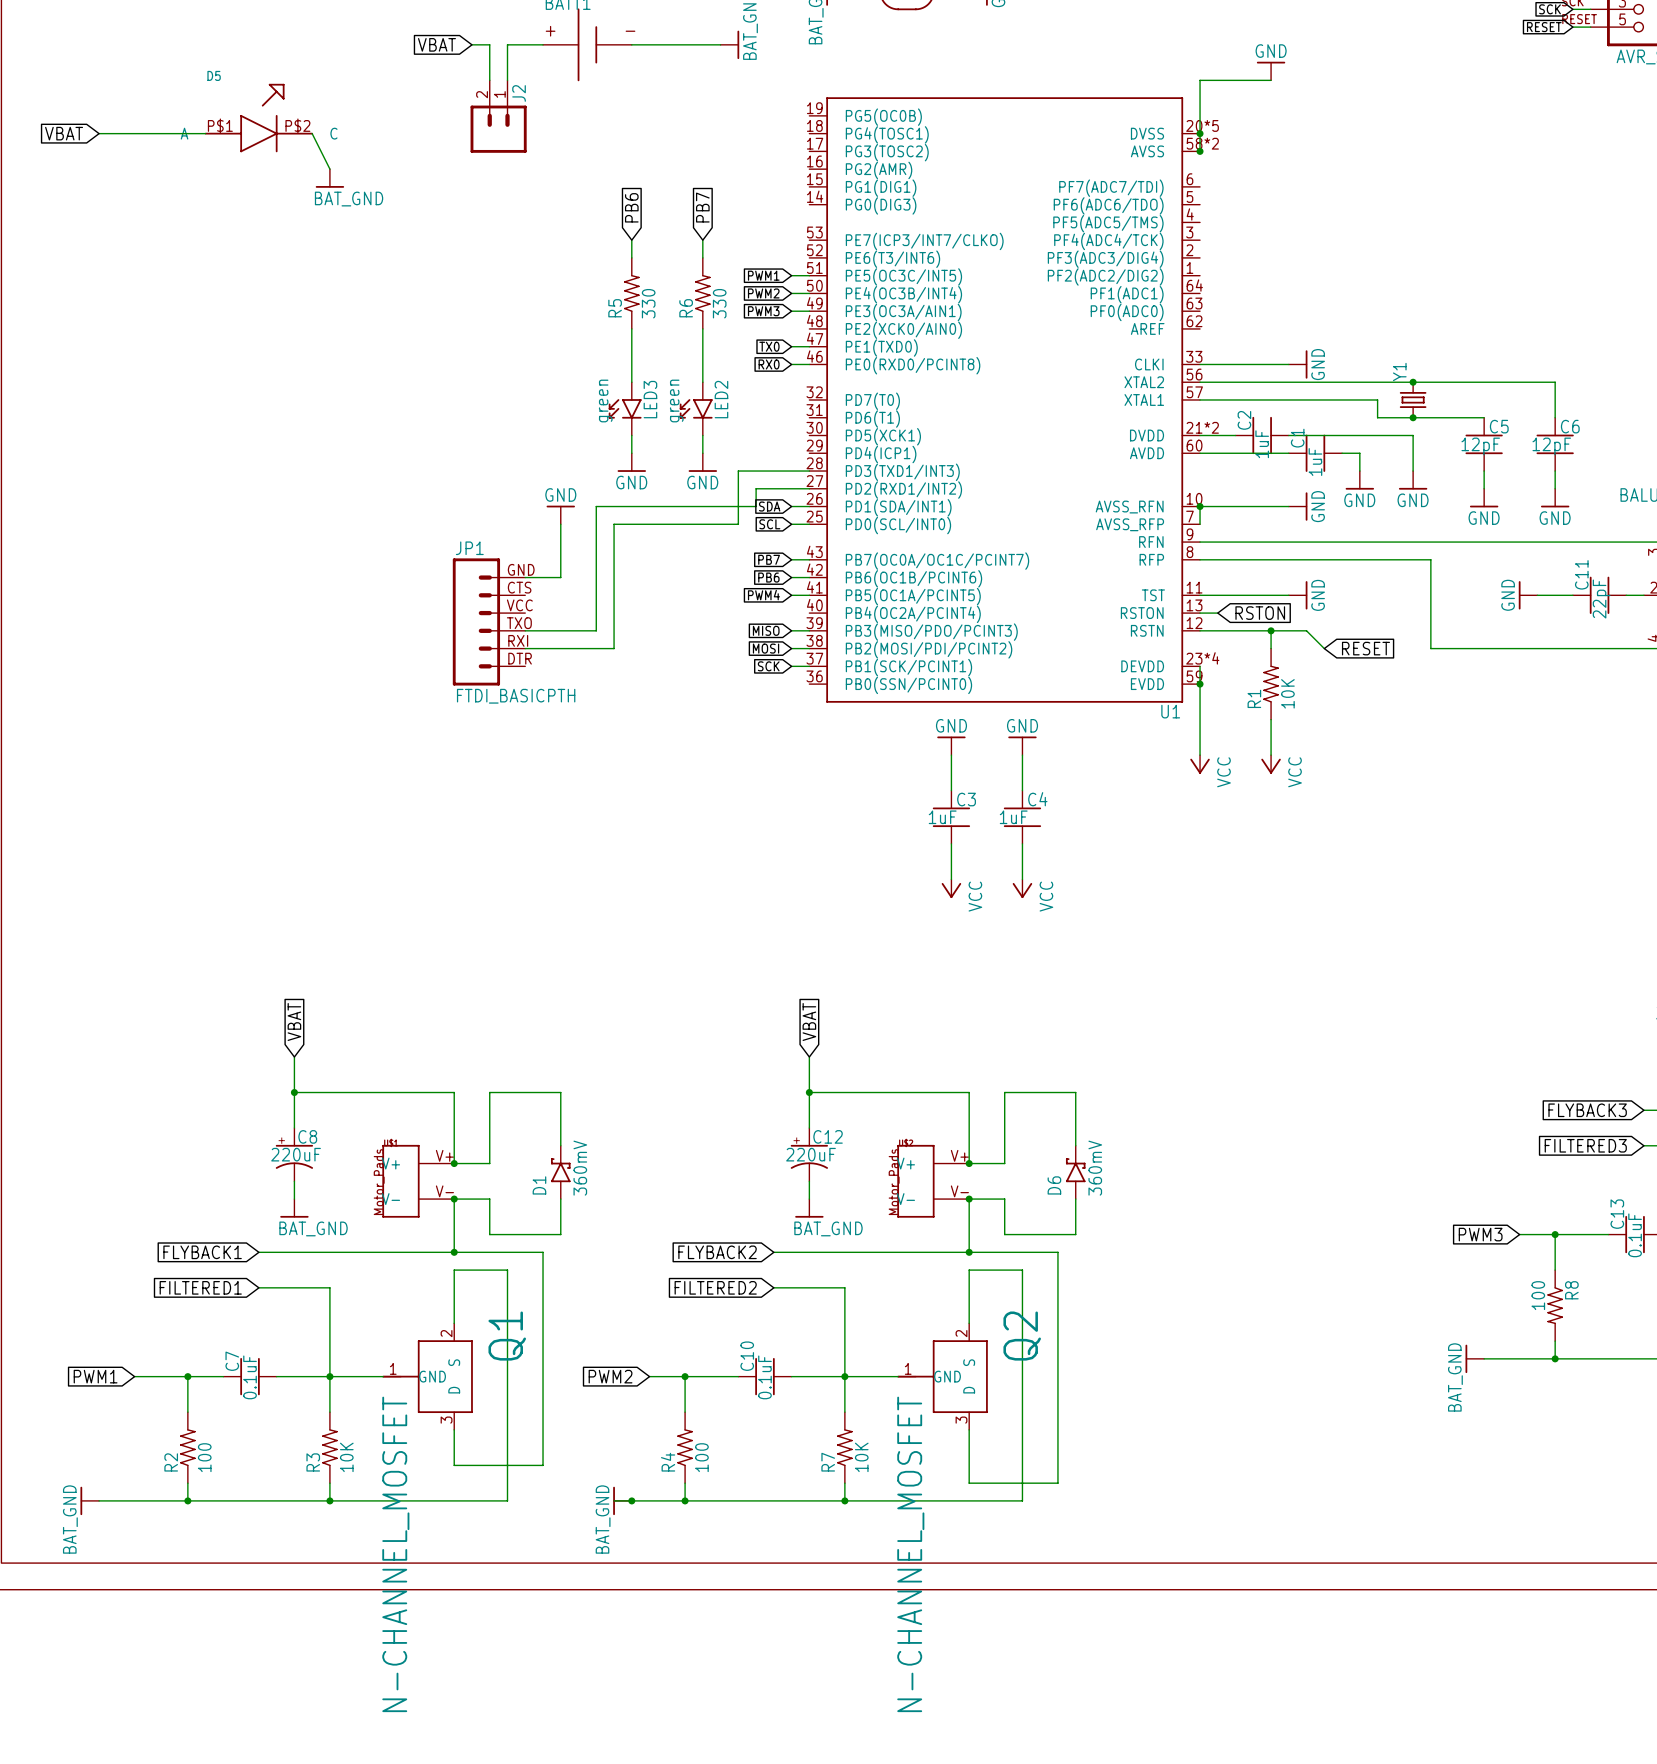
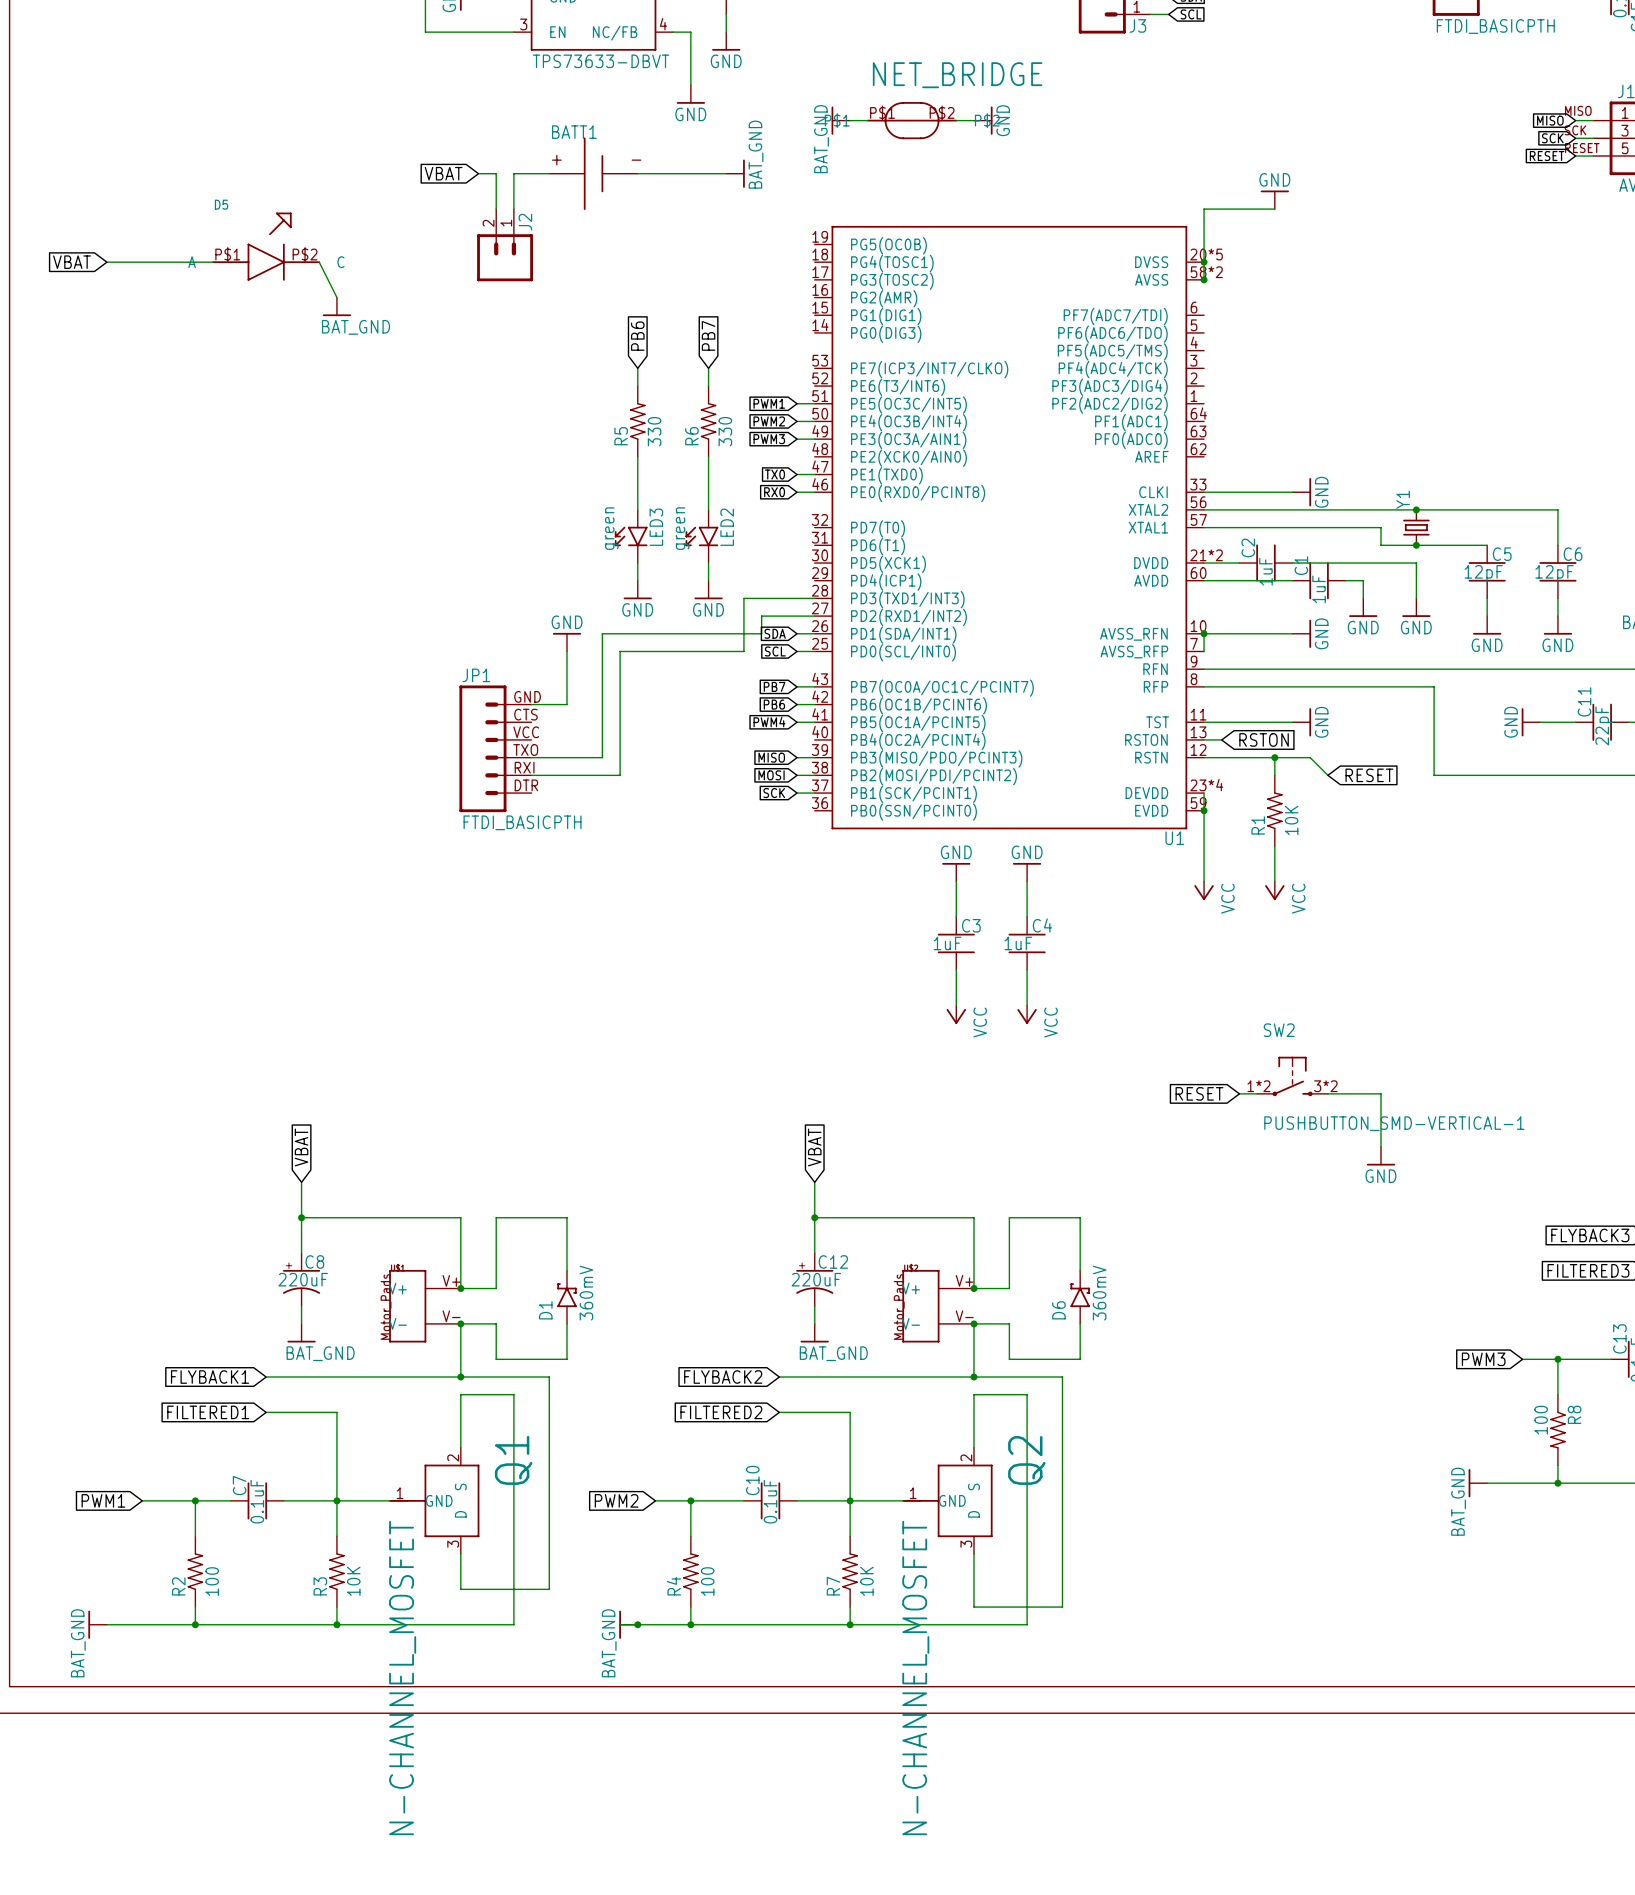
SW2: none -> PUSHBUTTON_SMD-VERTICAL-1 (1292, 1076)
global label: none -> RESET (1199, 1093)
wire: none -> (1239, 1093) (1257, 1093)
wire: none -> (1327, 1093) (1381, 1093) (1381, 1146)
power symbol: none -> GND (1381, 1156)

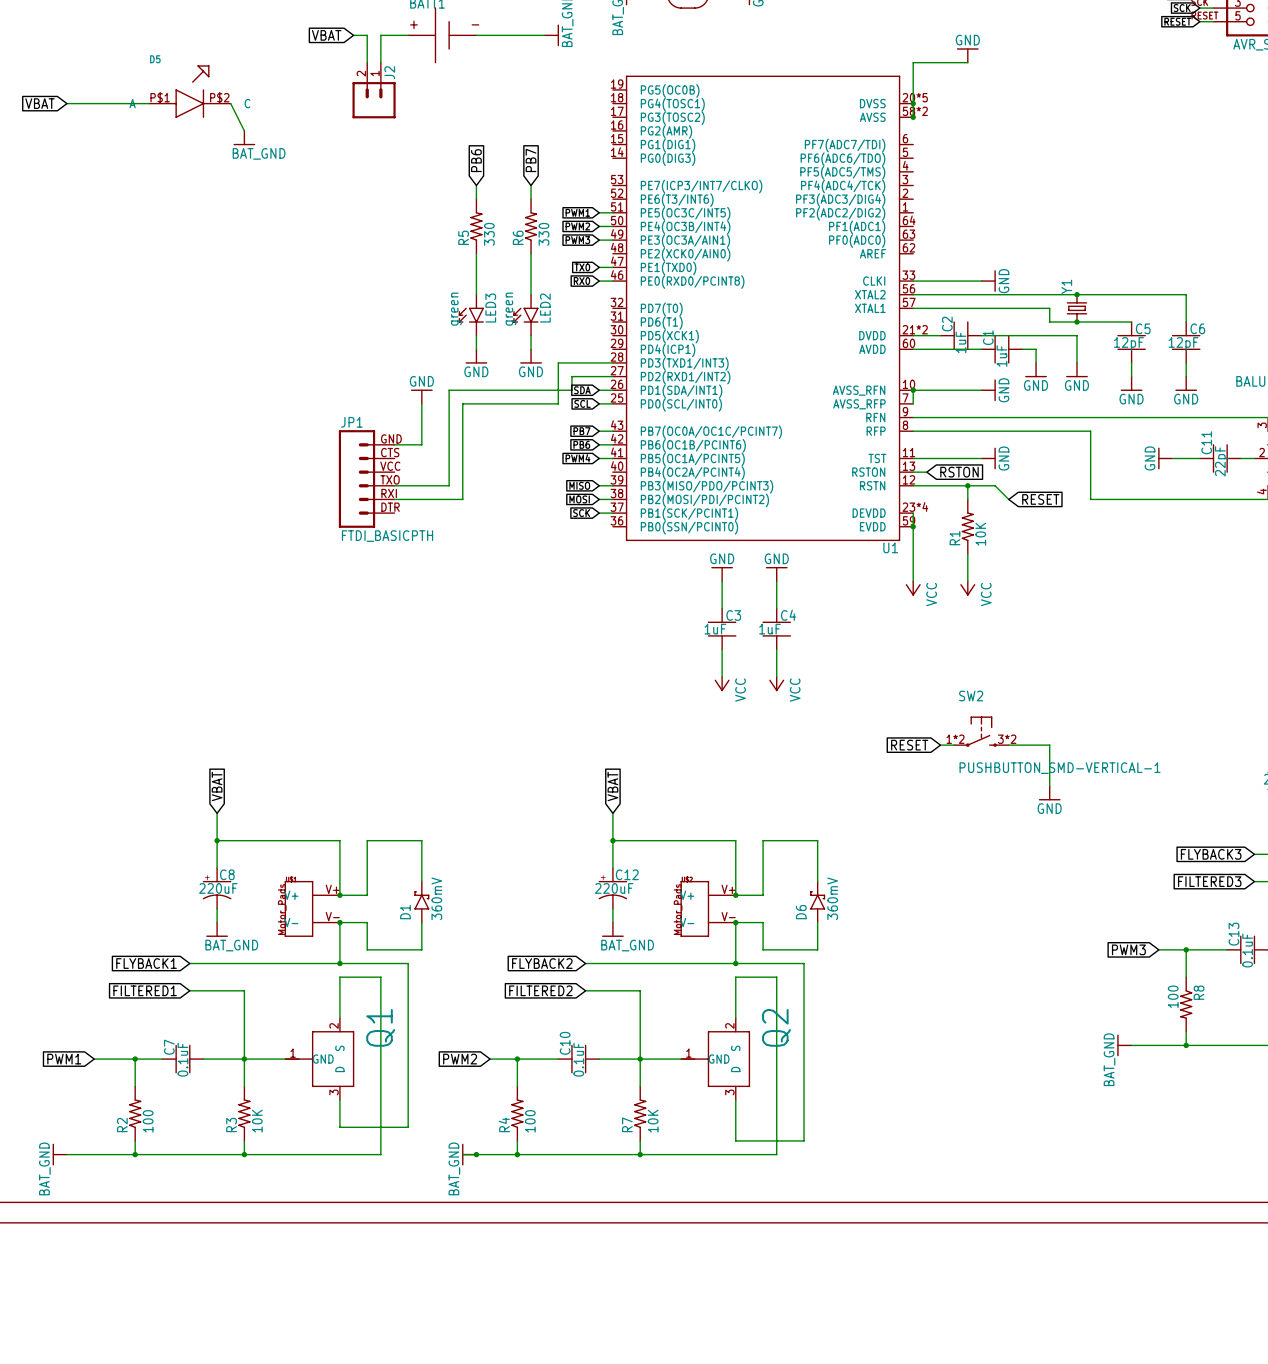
Q1 value: N-CHANNEL_MOSFET (402, 1678) -> none
Q2 value: N-CHANNEL_MOSFET (915, 1678) -> none

